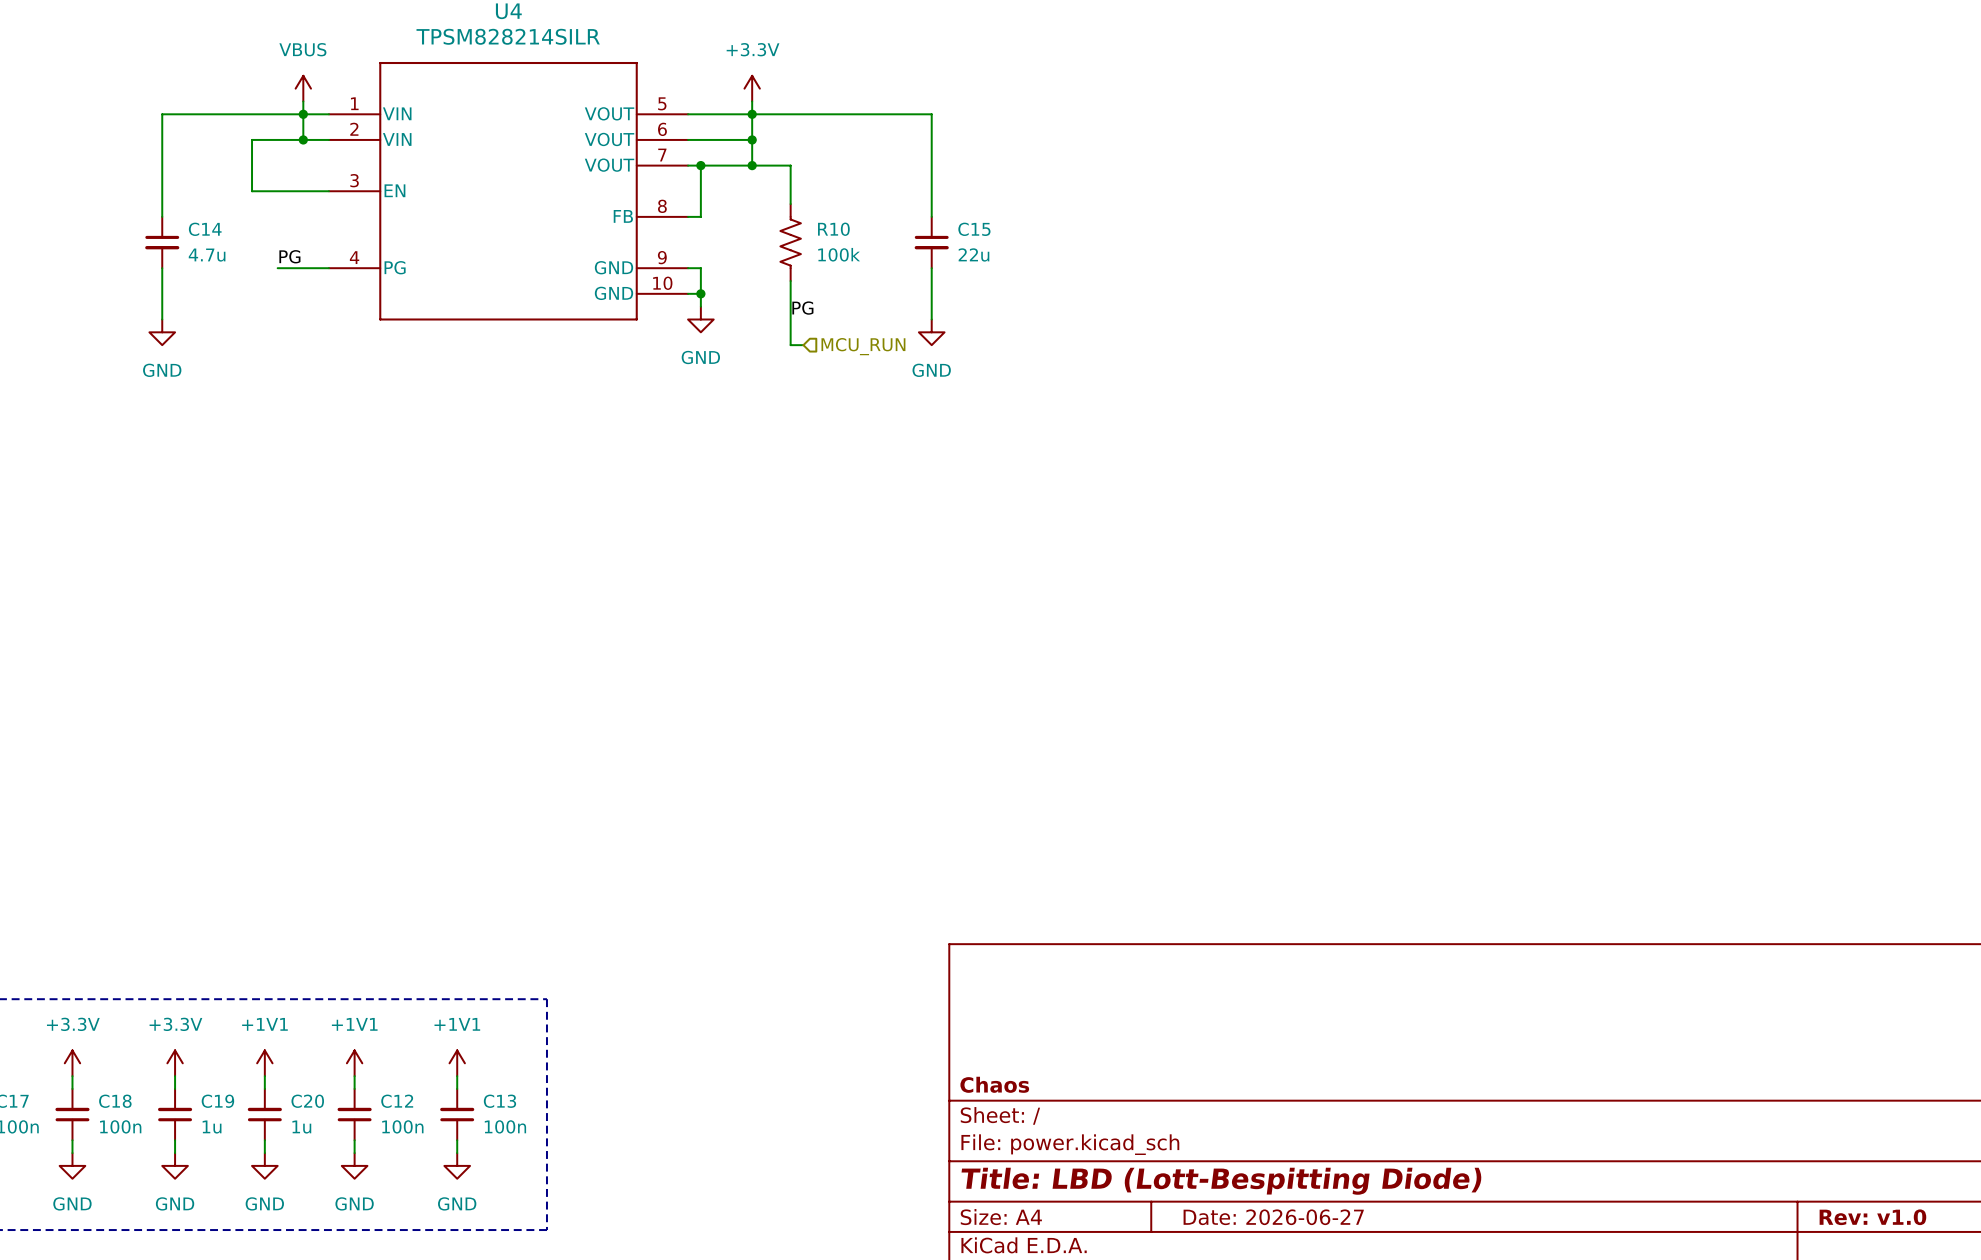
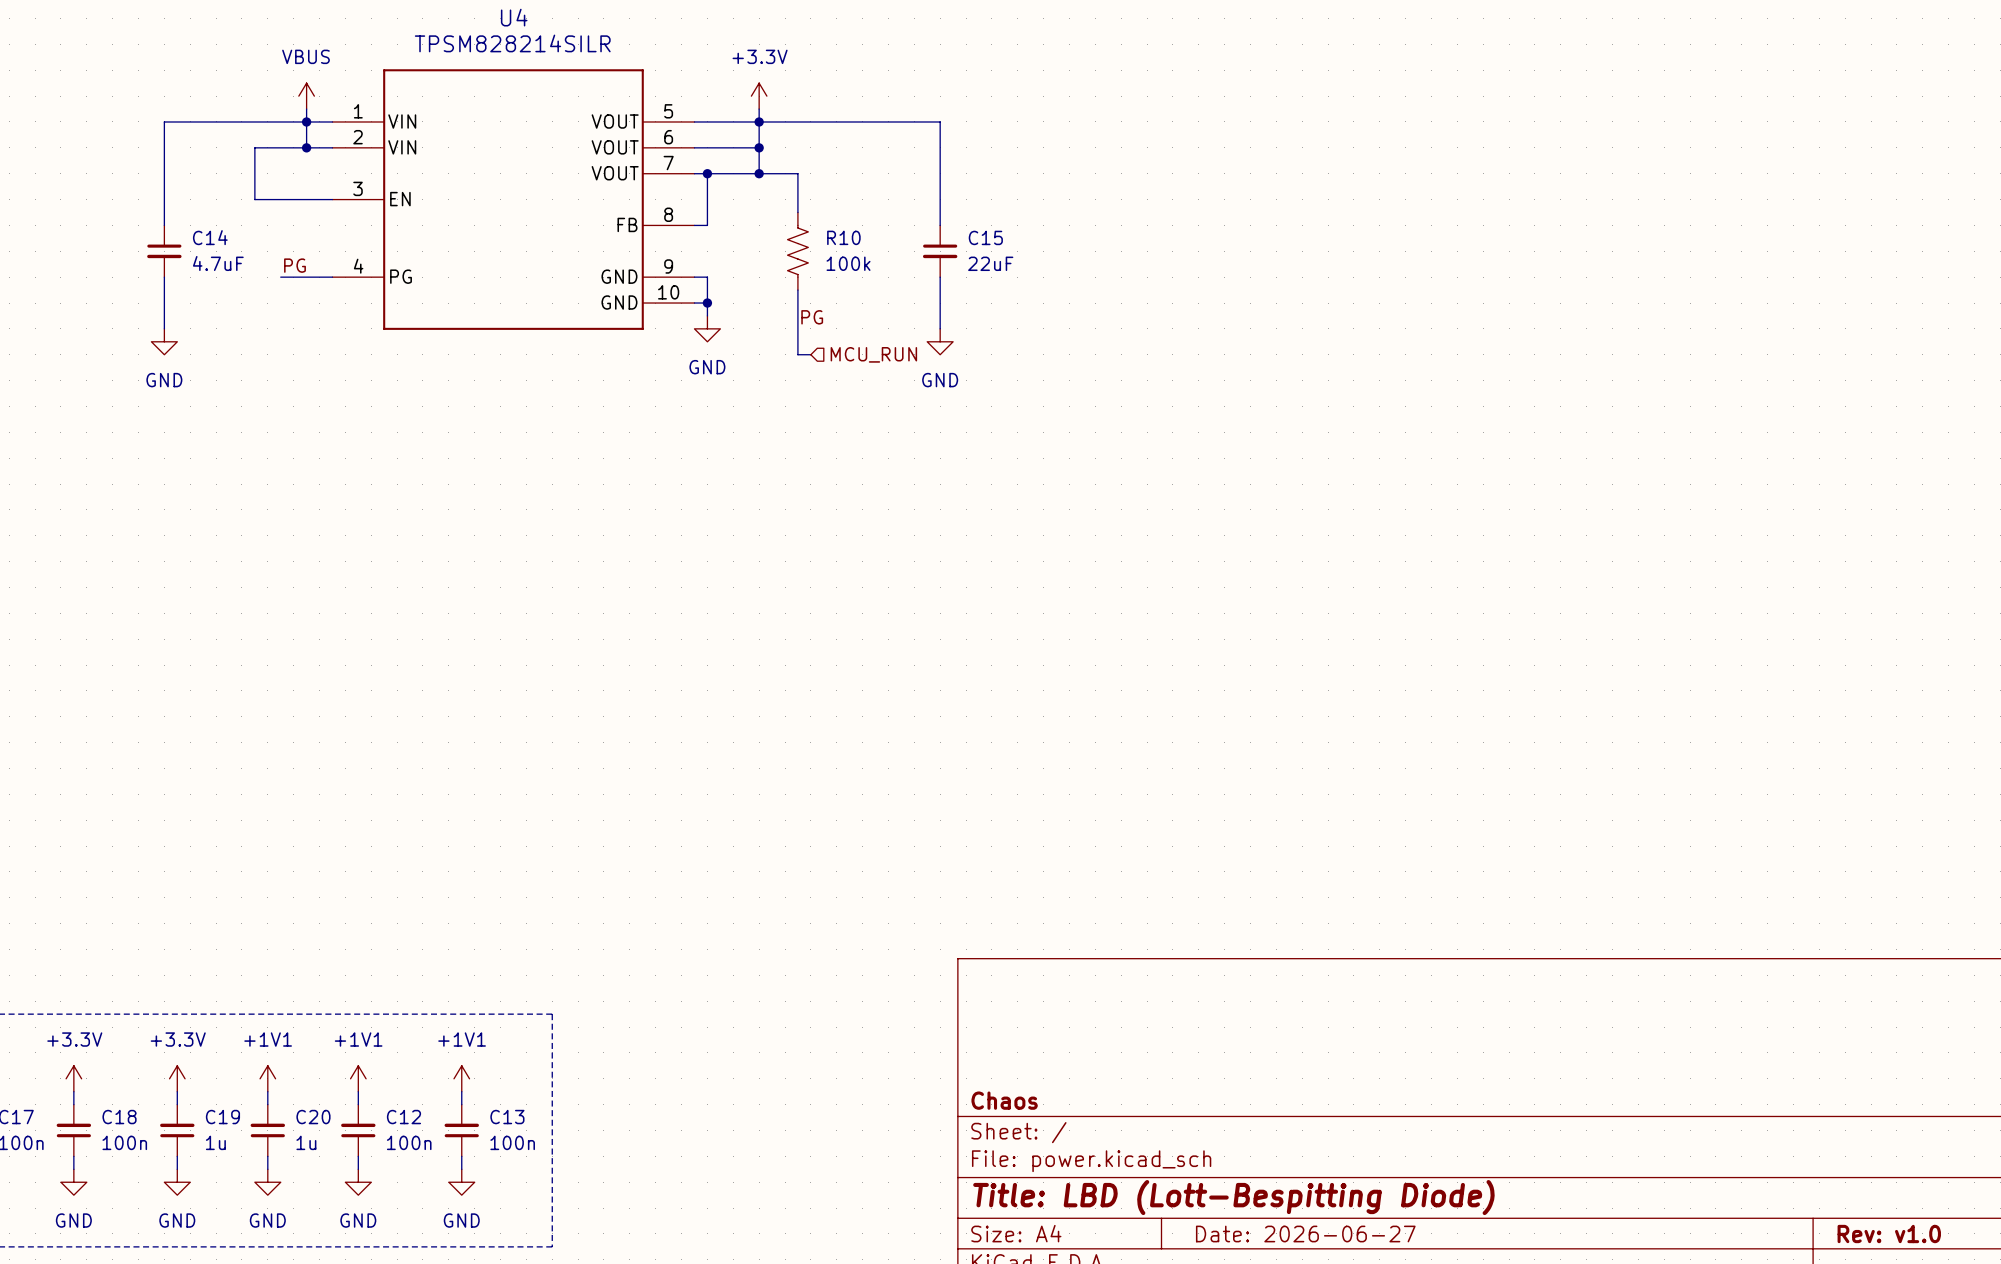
C15 value: 22u (973, 254) -> 22uF (990, 263)
C14 value: 4.7u (207, 255) -> 4.7uF (218, 263)

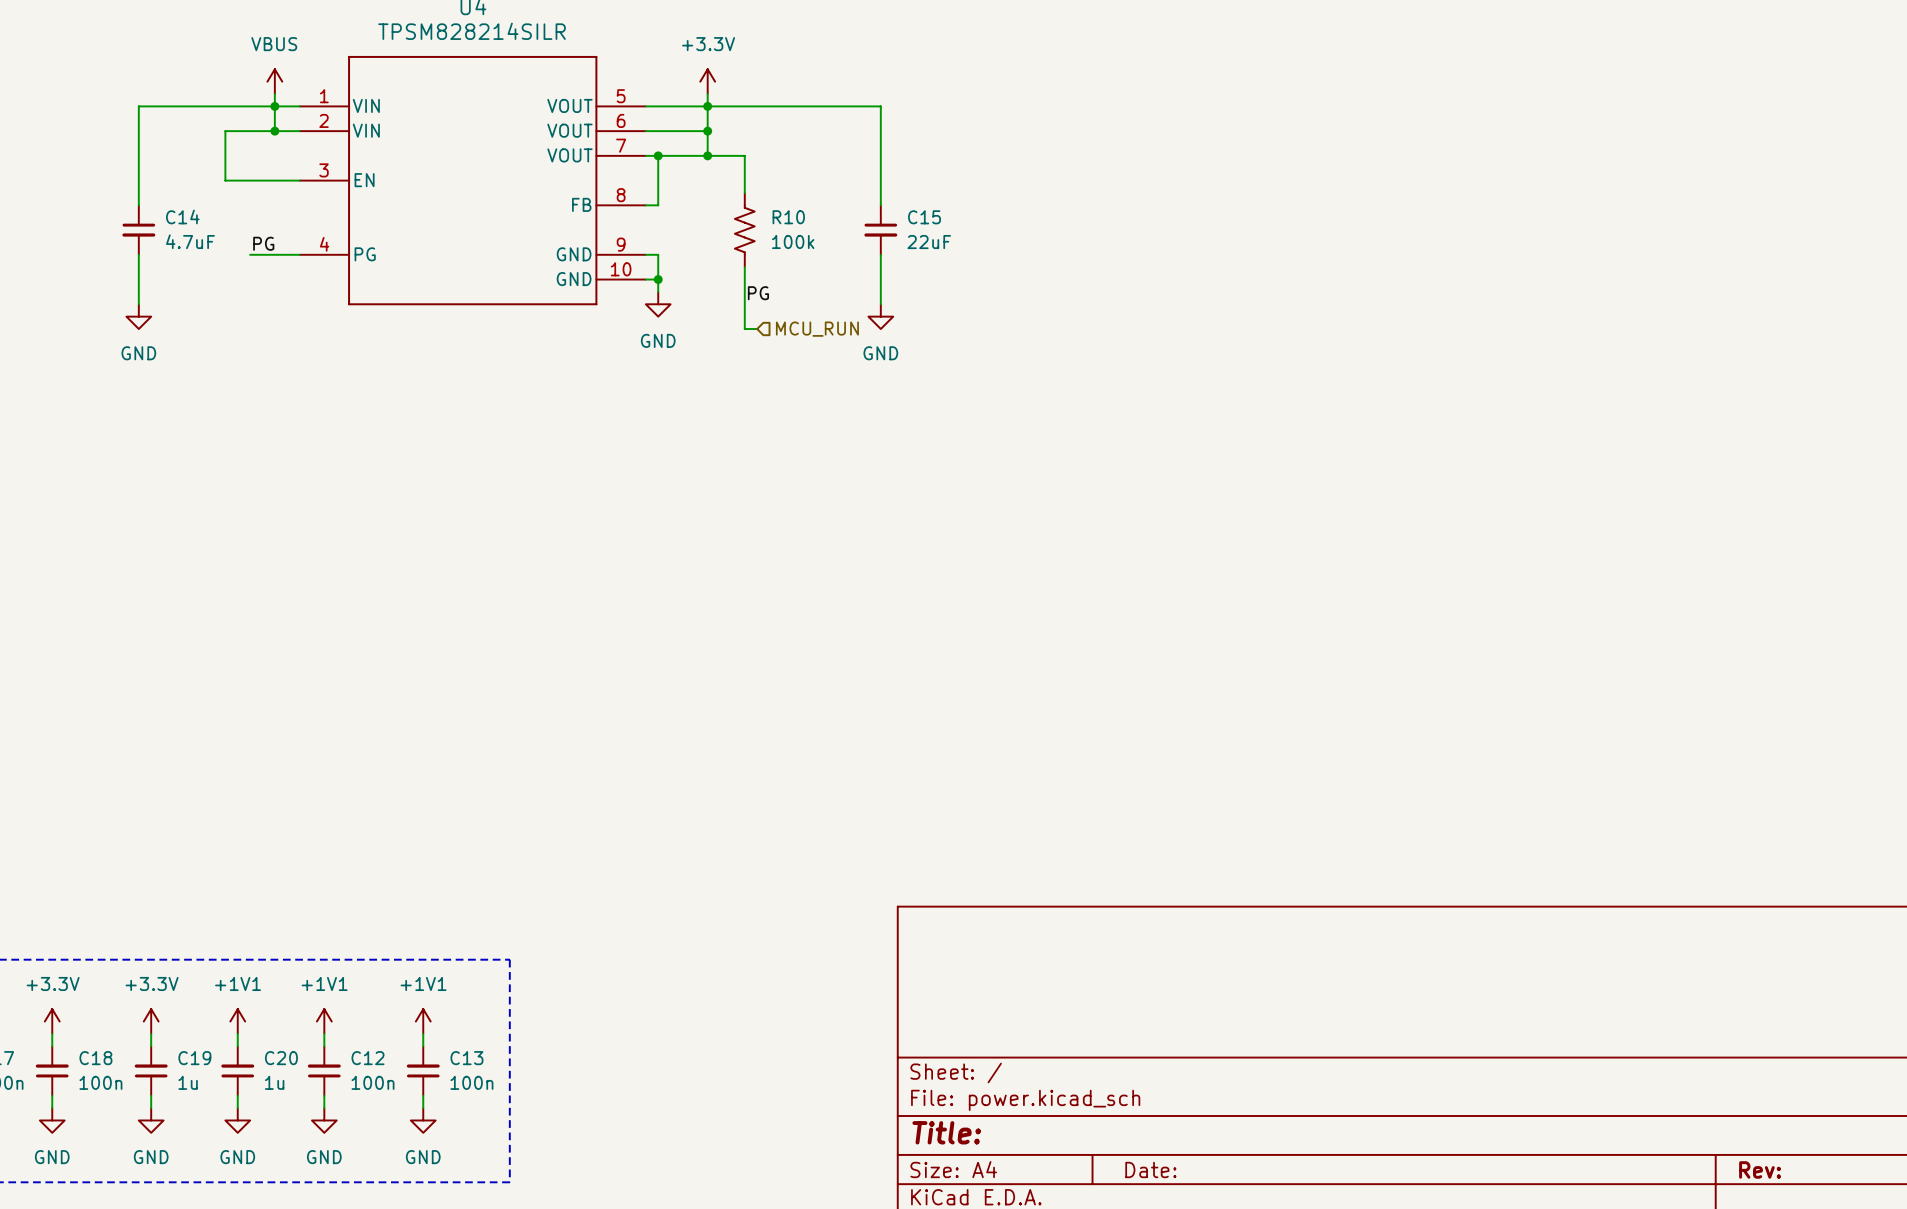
title block: Chaos (1004, 1100) -> none
title block: Title: LBD (Lott-Bespitting Diode) (1233, 1197) -> Title: (946, 1132)
title block: Date: 2026-06-27 (1305, 1234) -> Date: (1150, 1169)
title block: Rev: v1.0 (1889, 1234) -> Rev: (1760, 1169)

